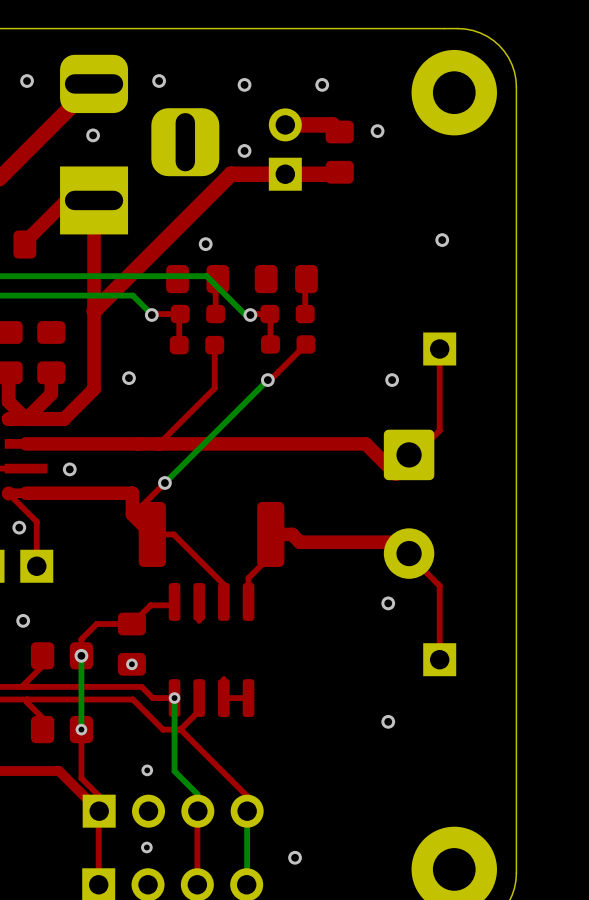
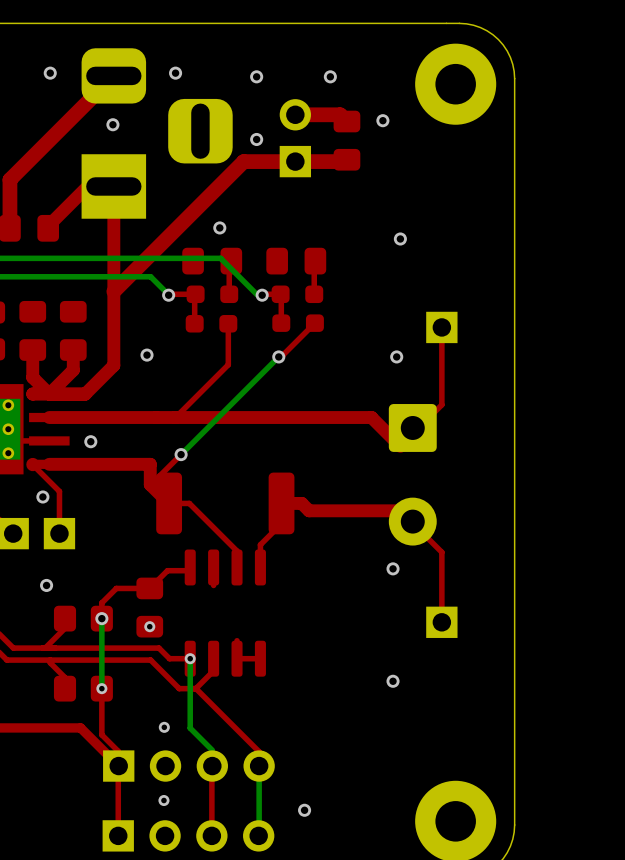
via position: (442, 240) -> (400, 238)

